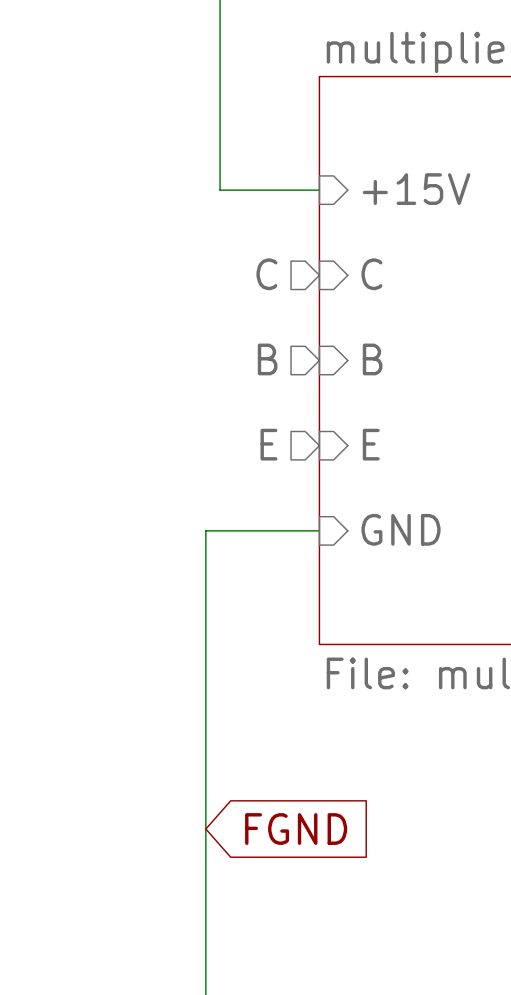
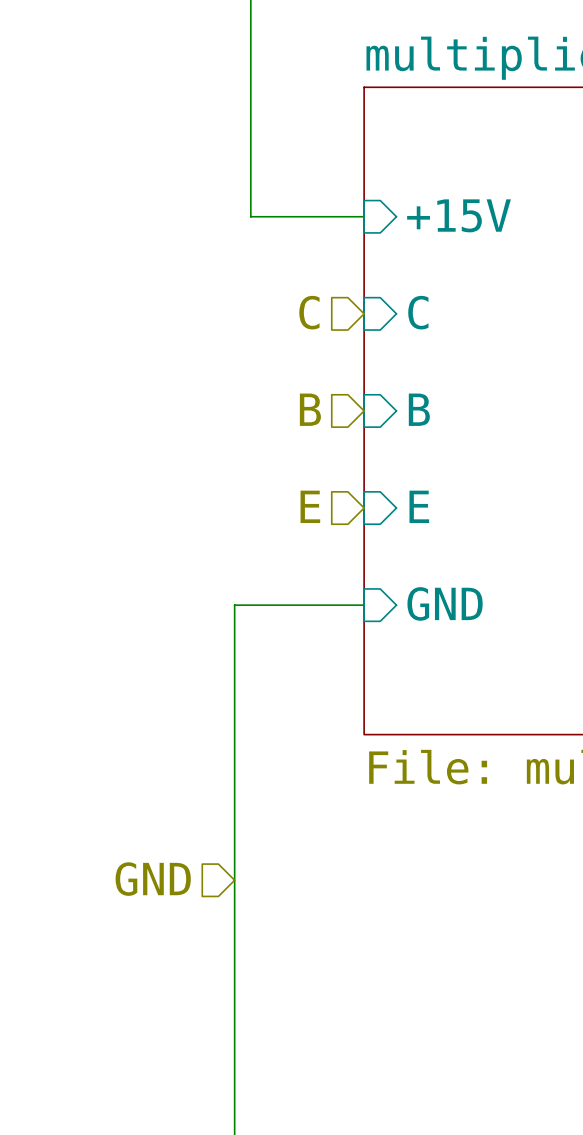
hierarchical label: none -> GND (153, 879)
global label: FGND (296, 829) -> none

